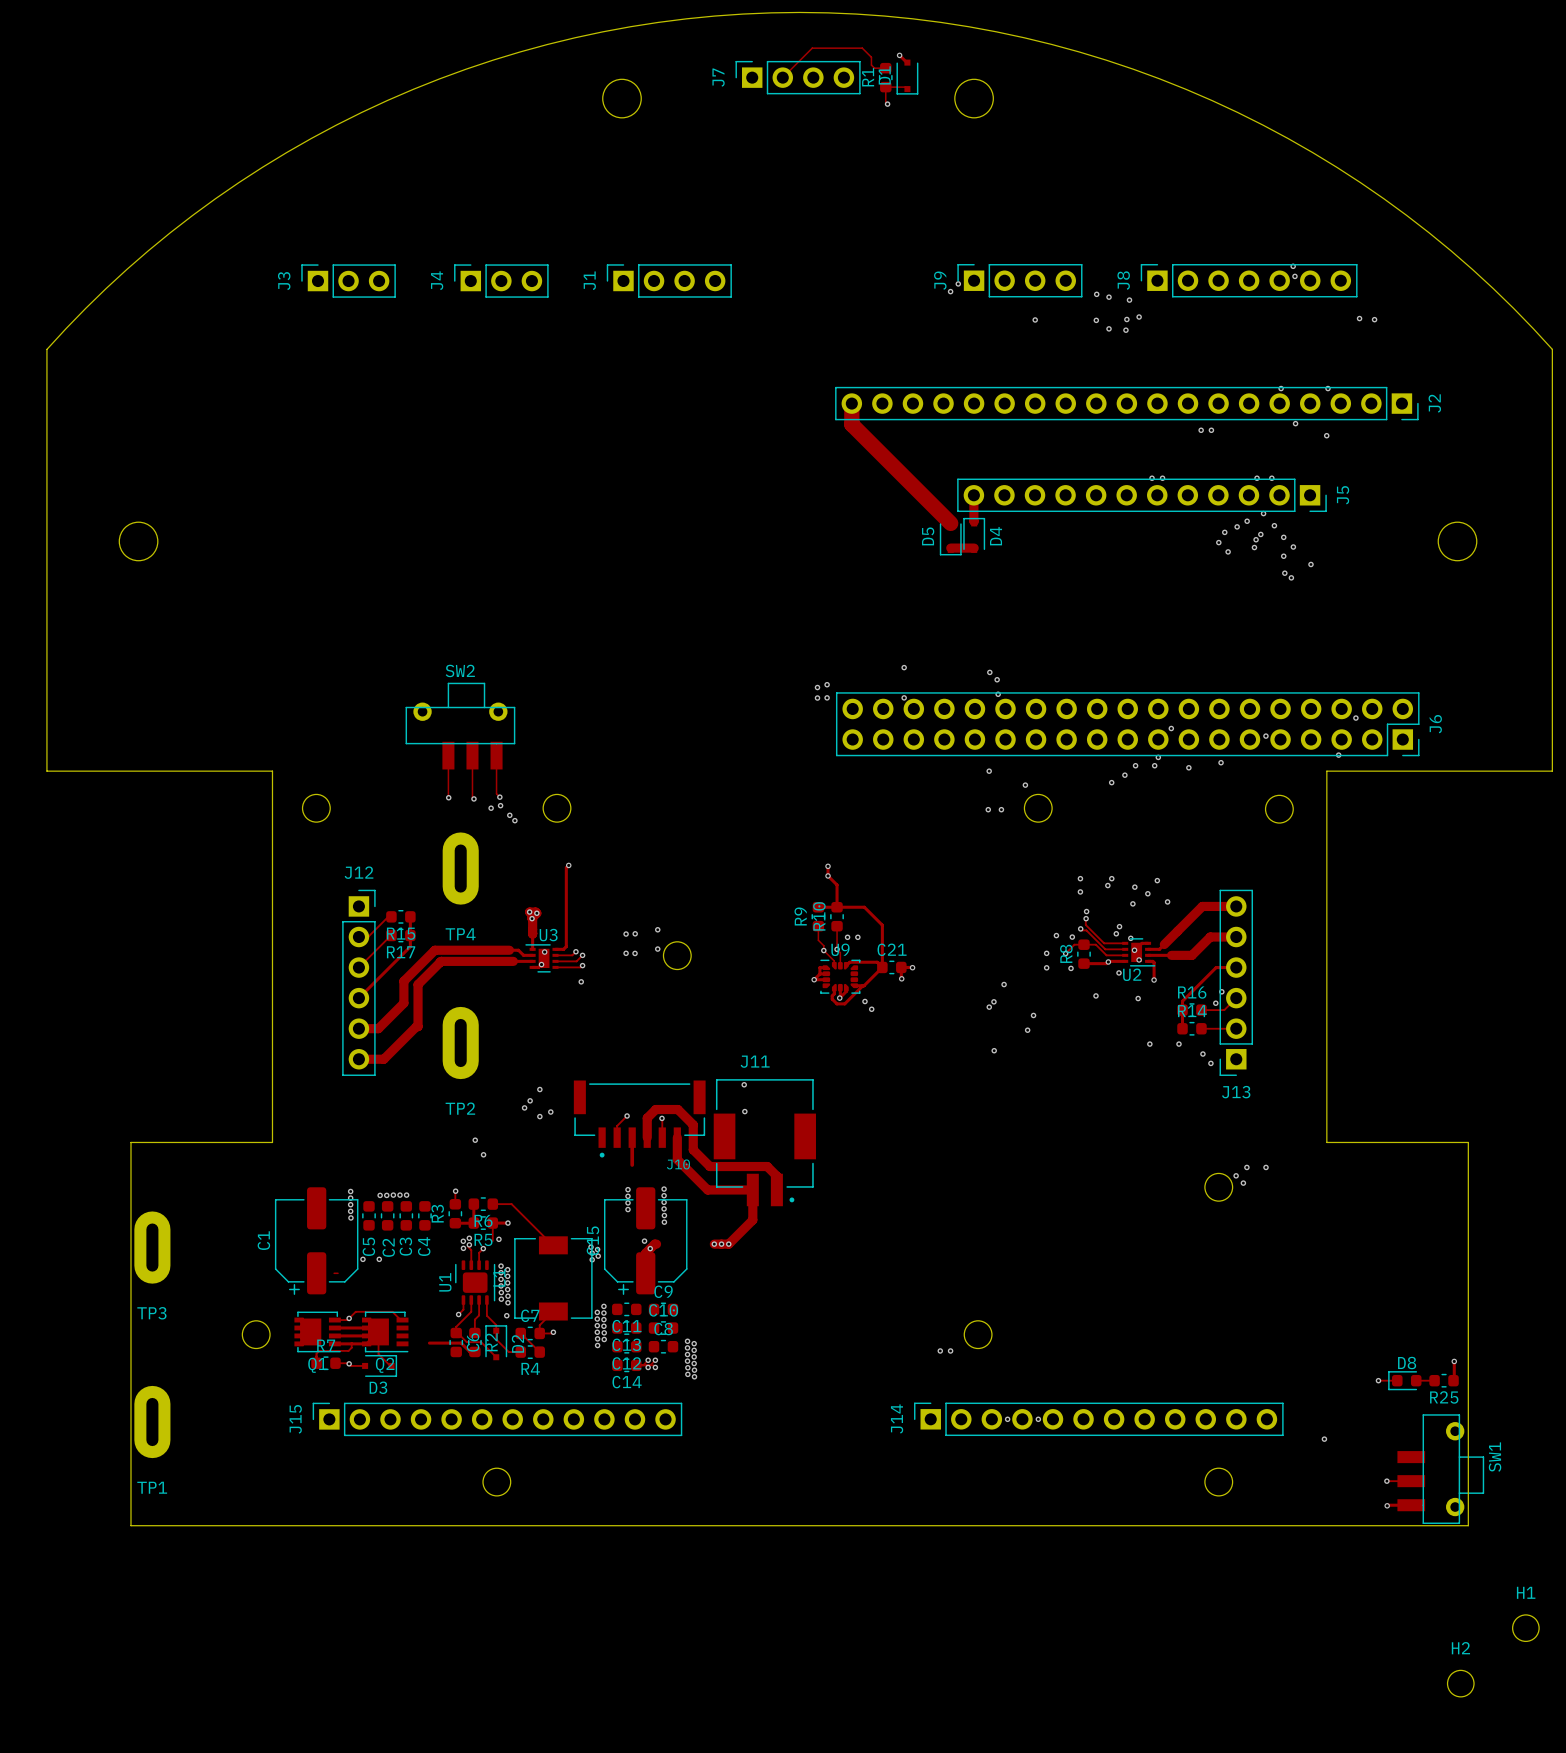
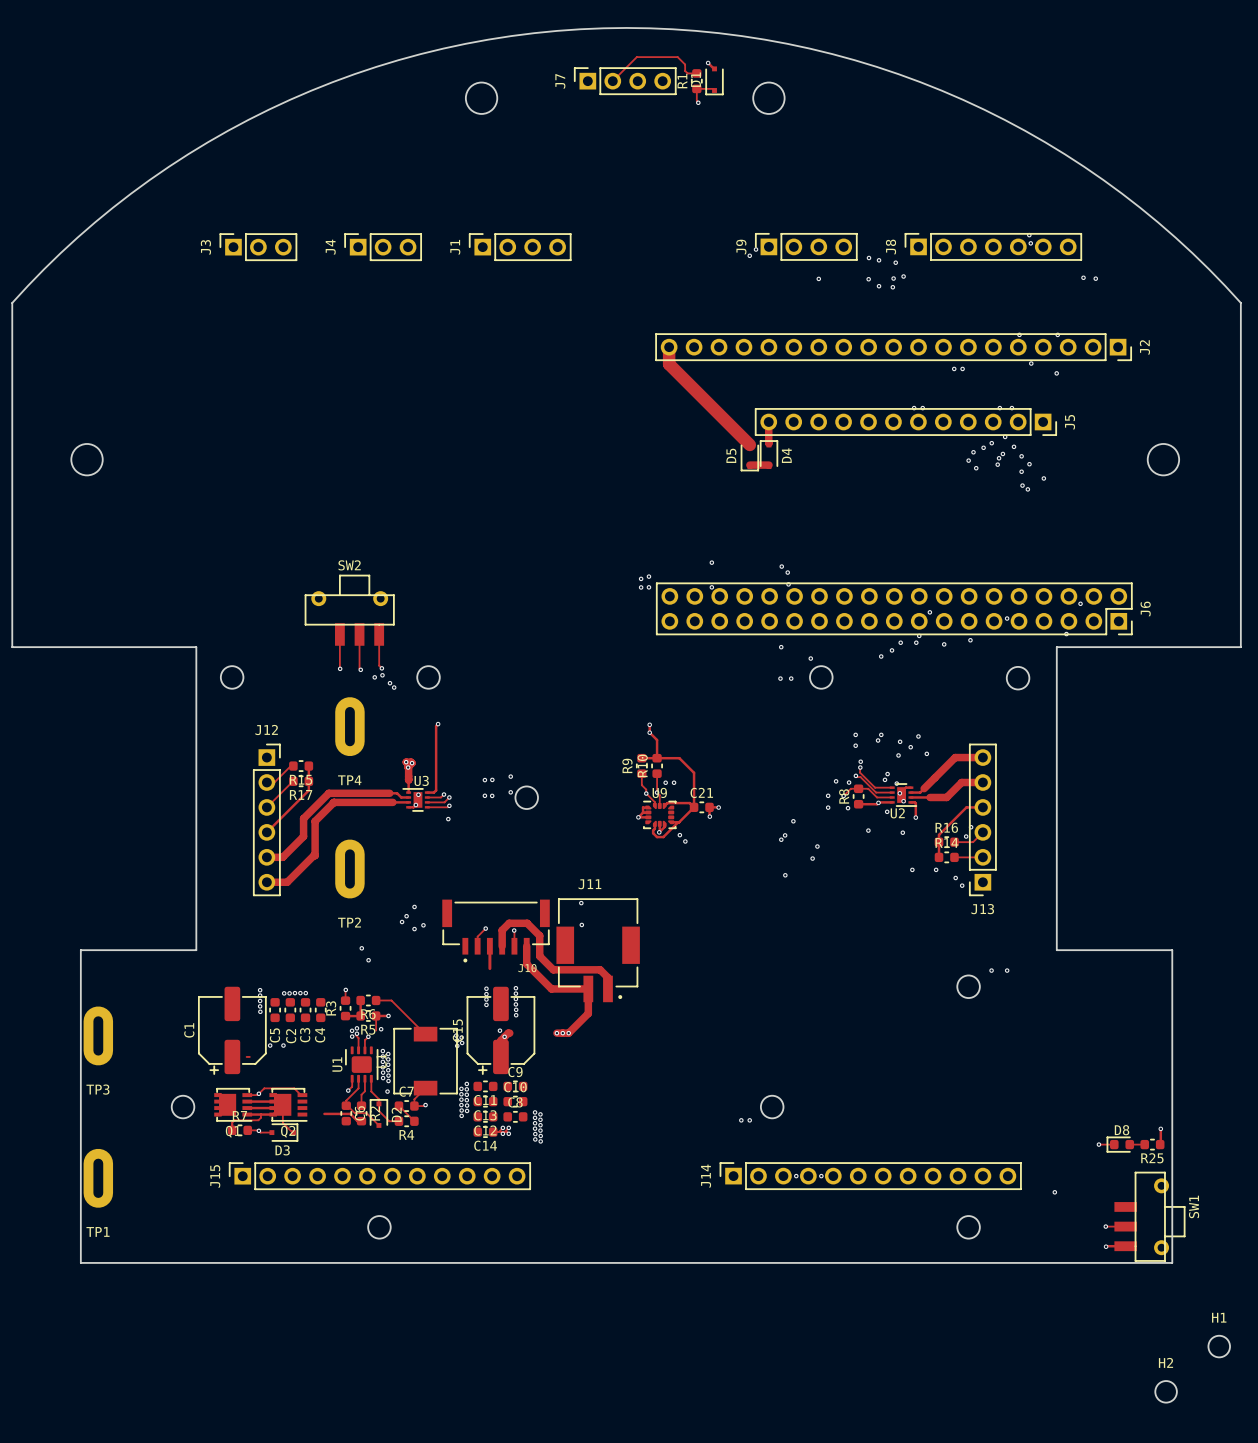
via: (1236, 1175) -> none
via: (1243, 1183) -> none

